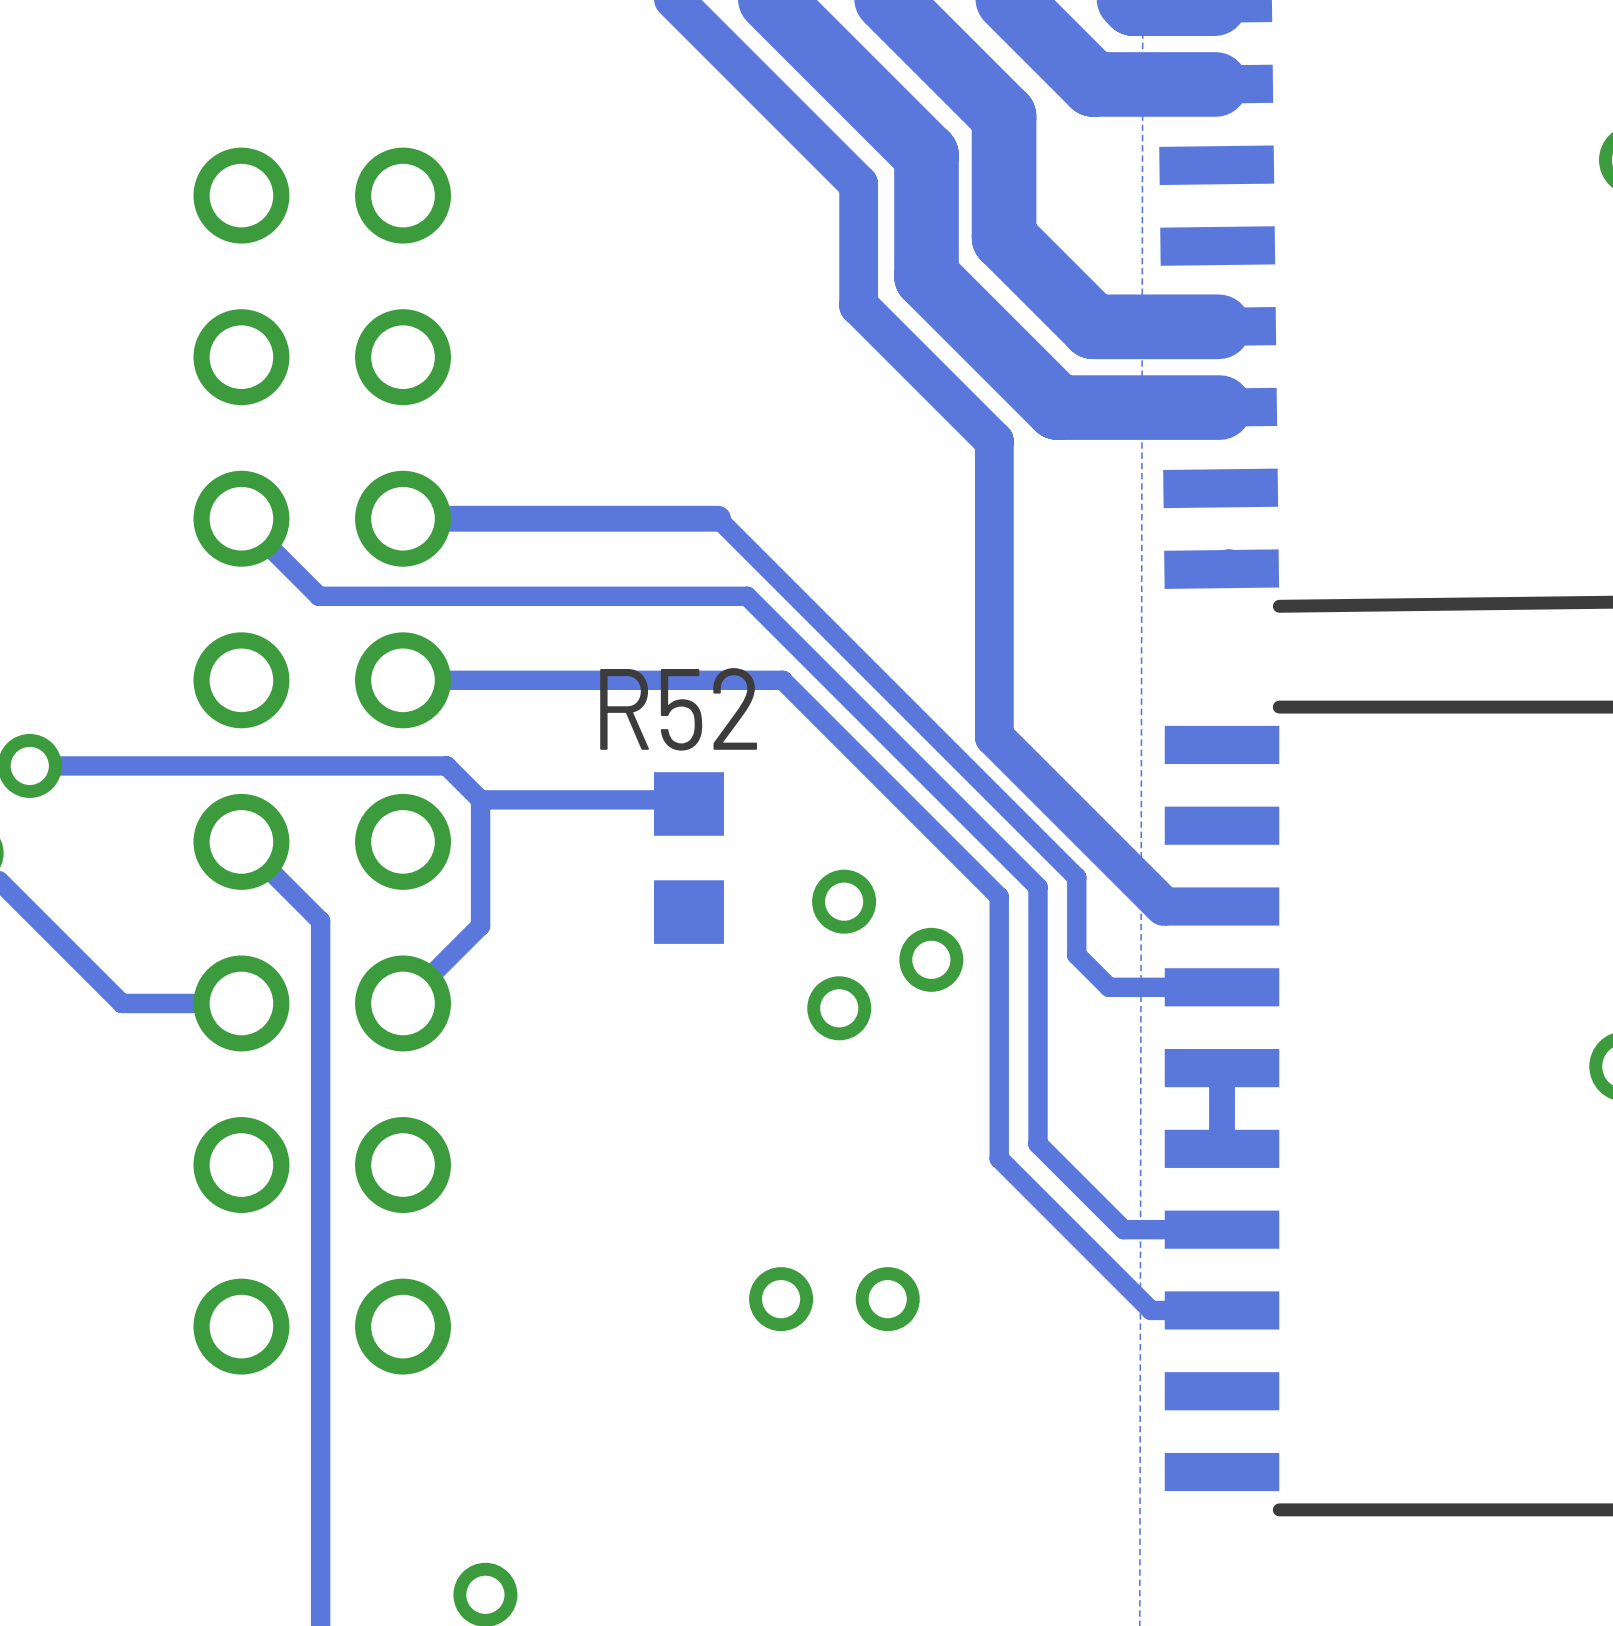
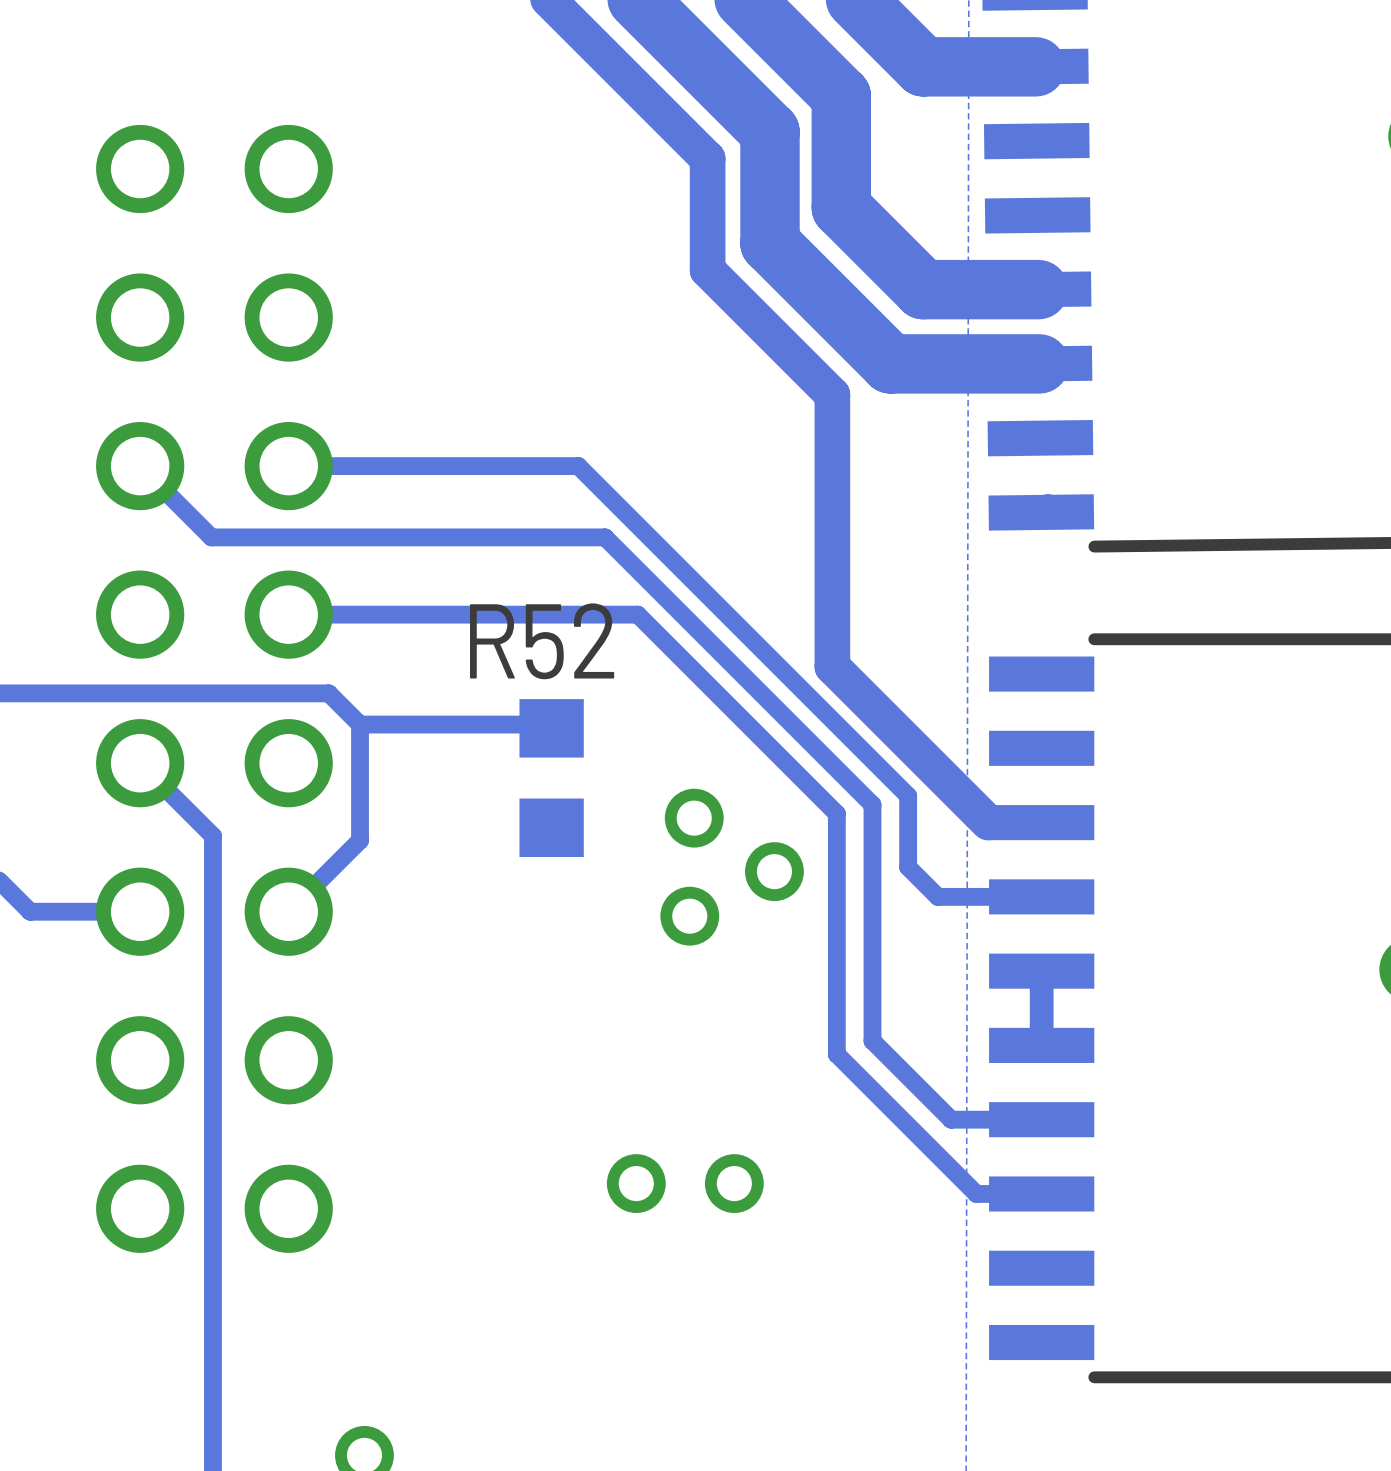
track width: thick (718, 518) (403, 518) -> thin (578, 466) (288, 466)

